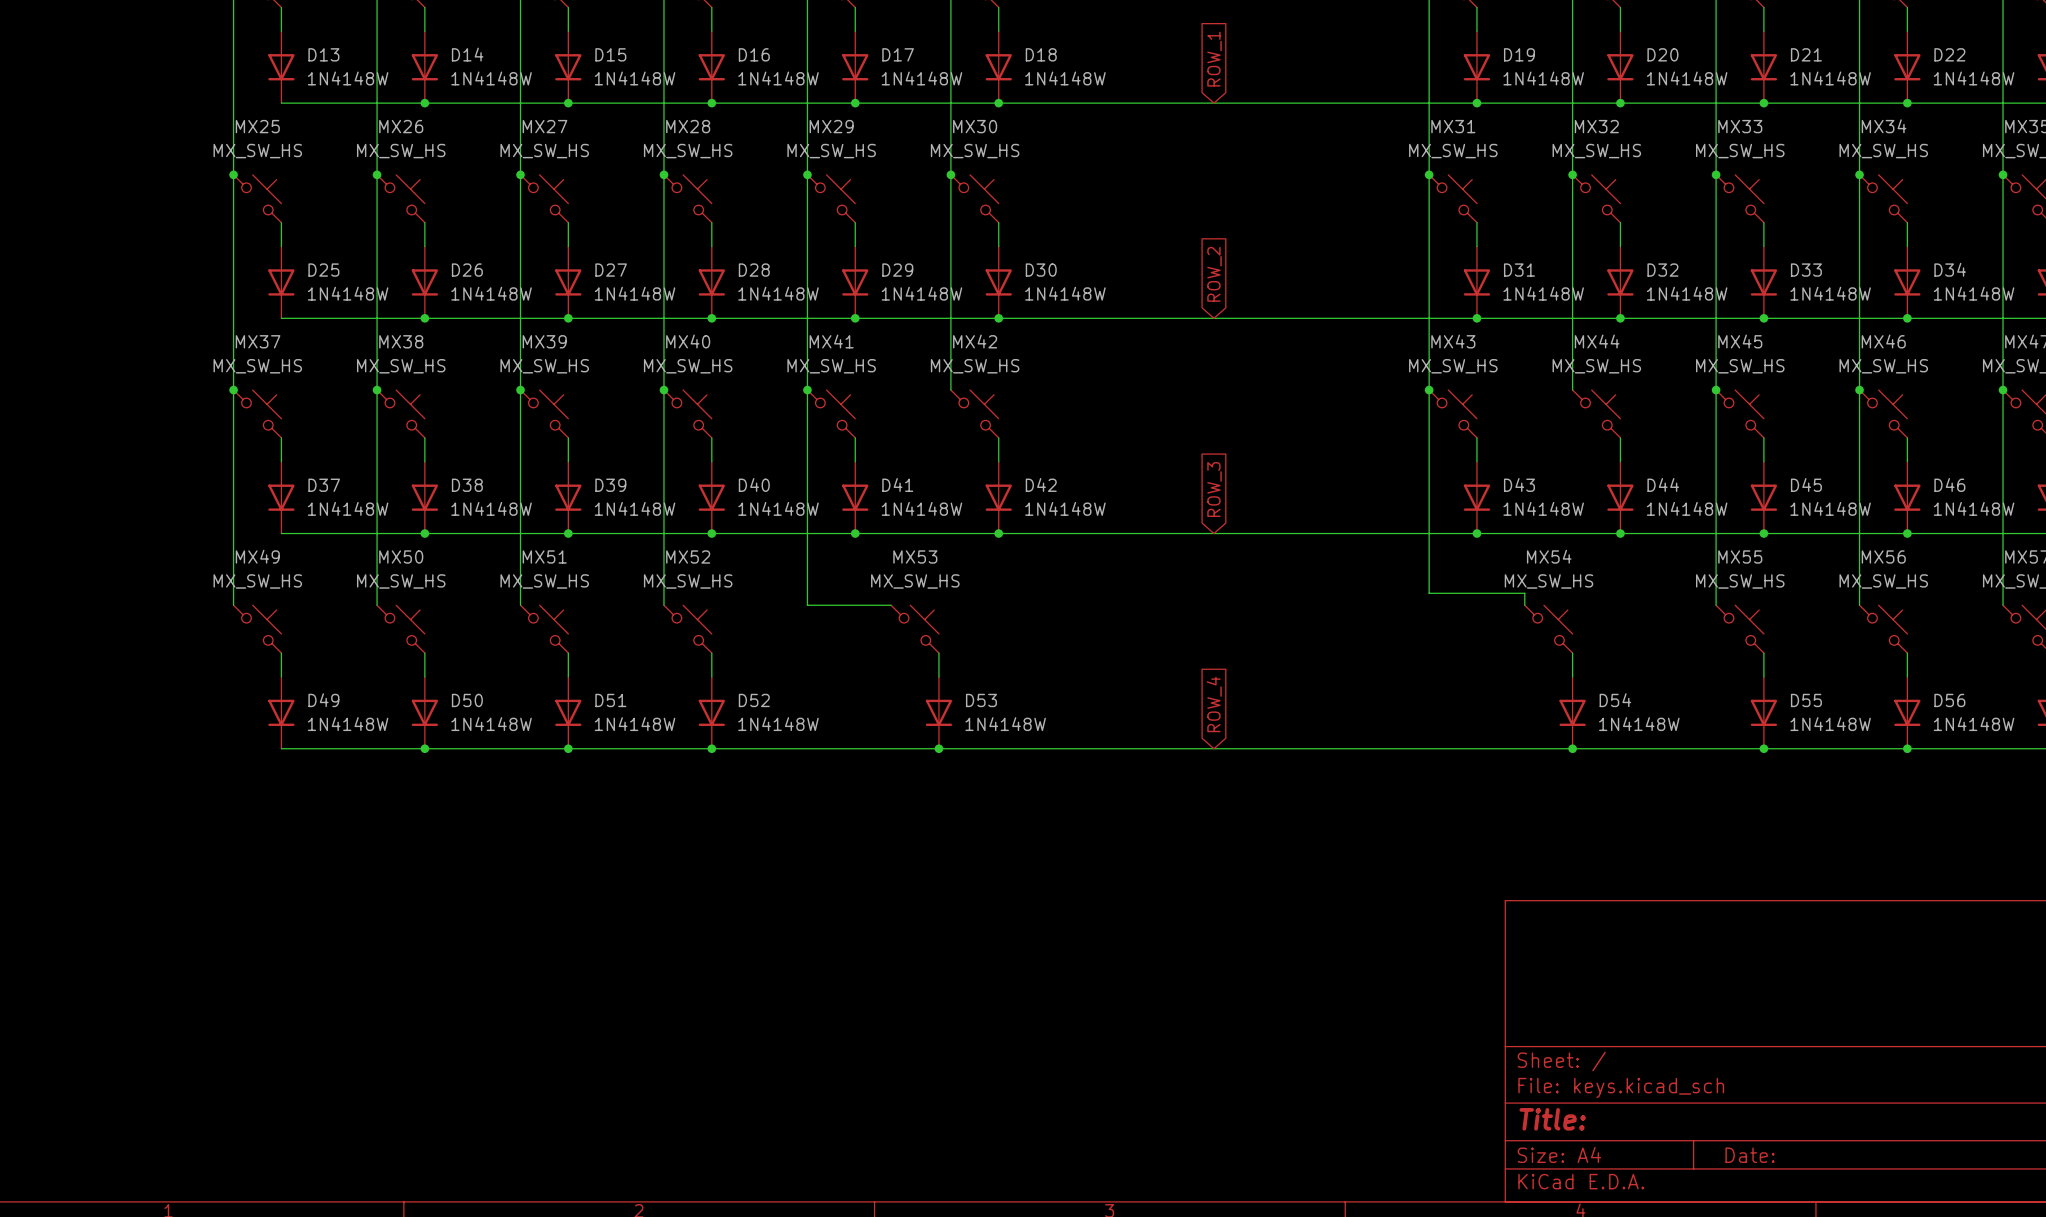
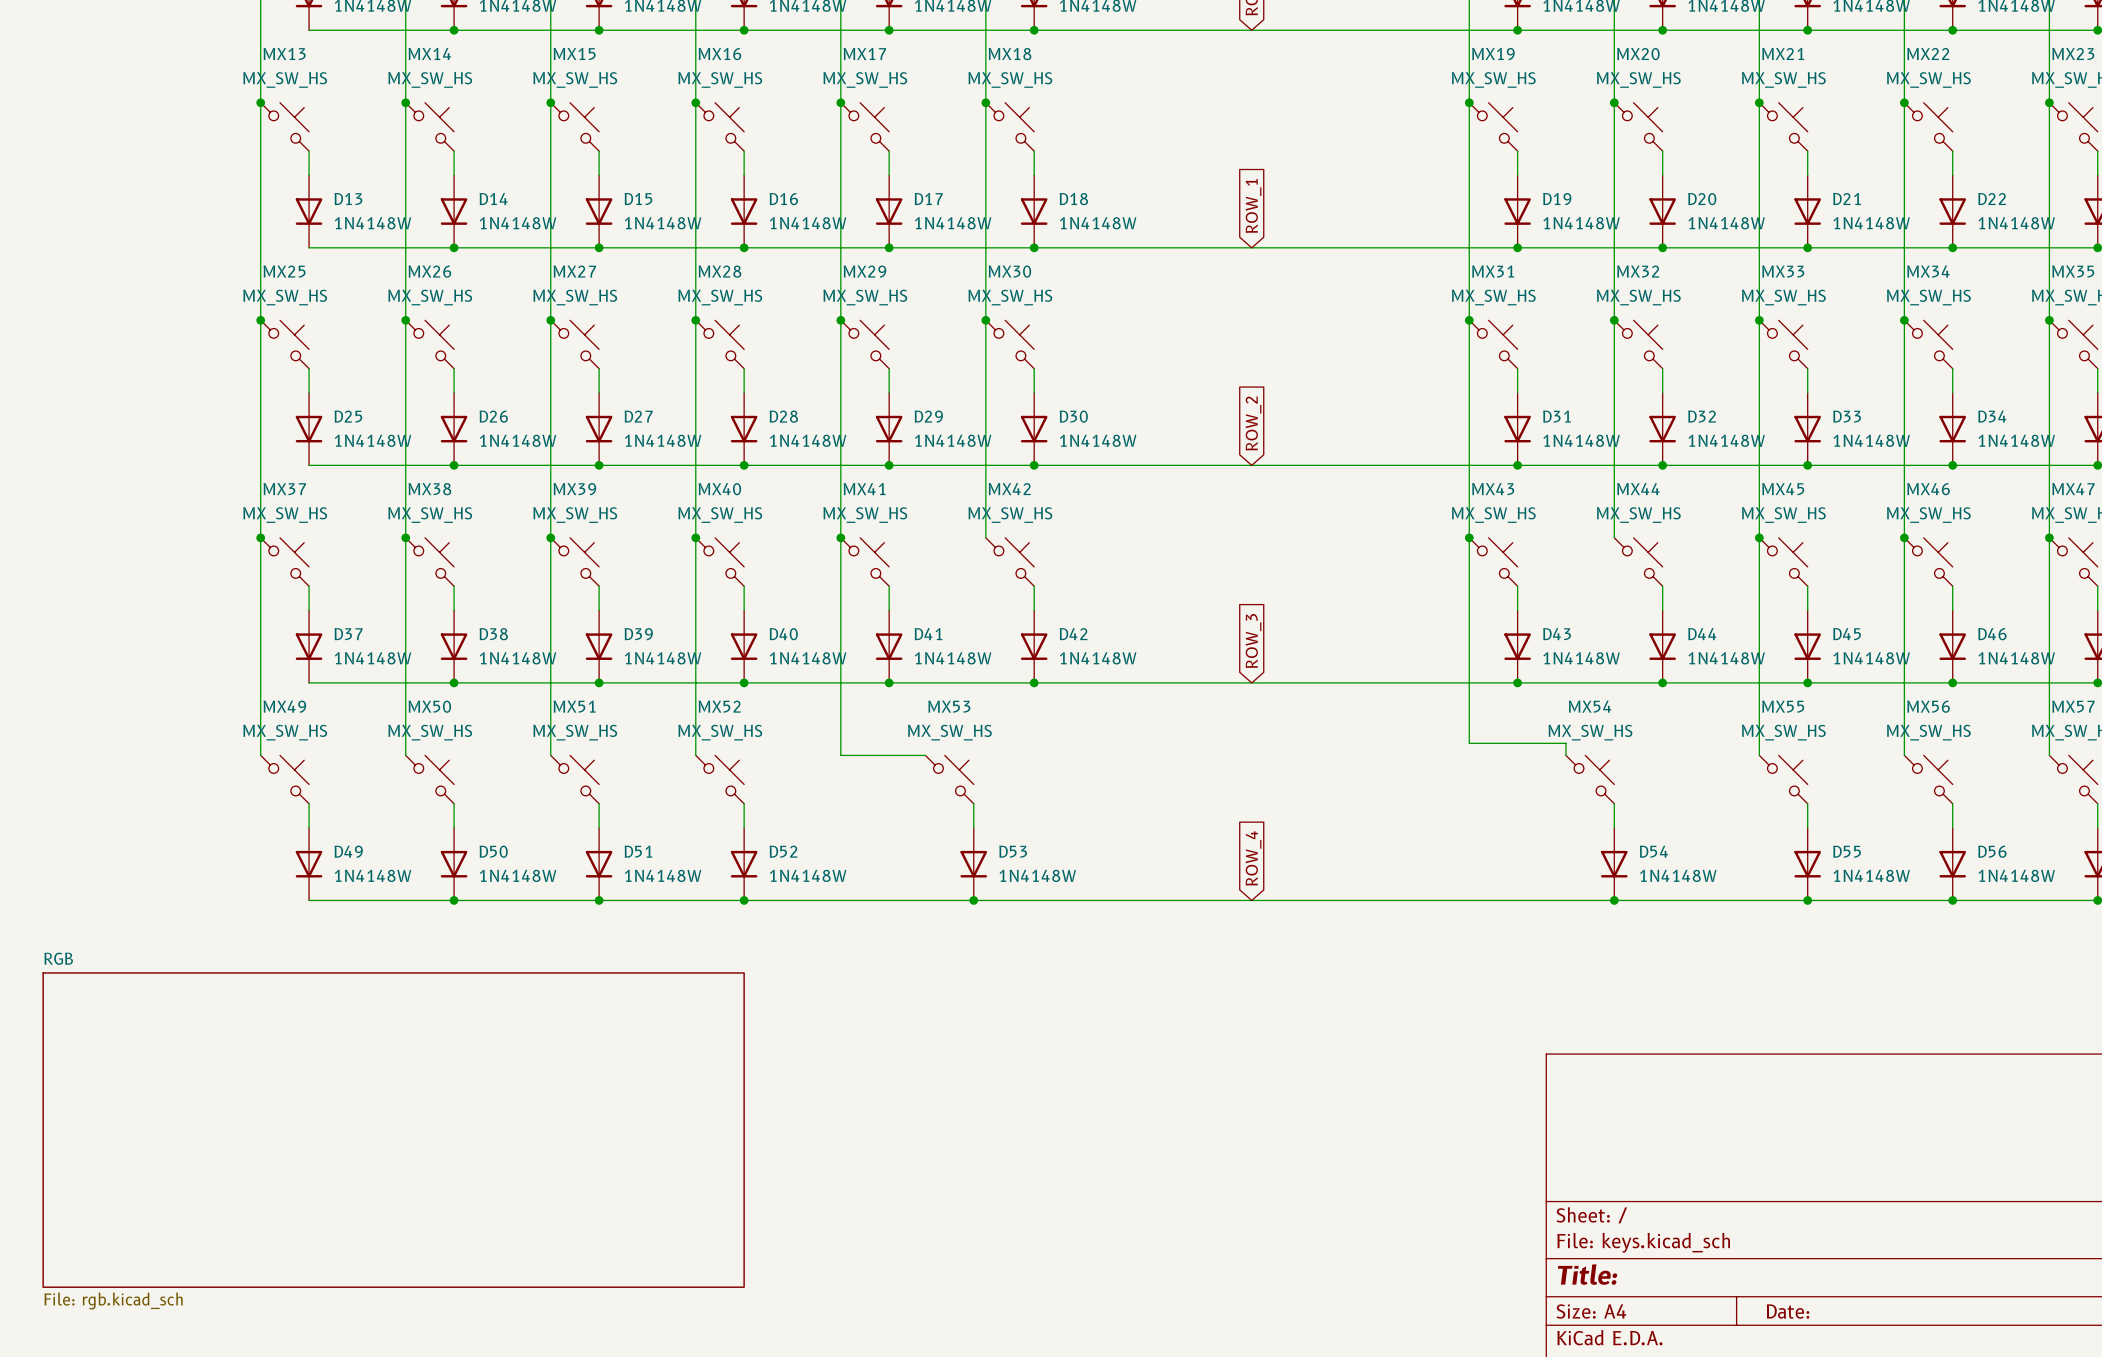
sheet RGB: none -> File: rgb.kicad_sch (393, 1130)

